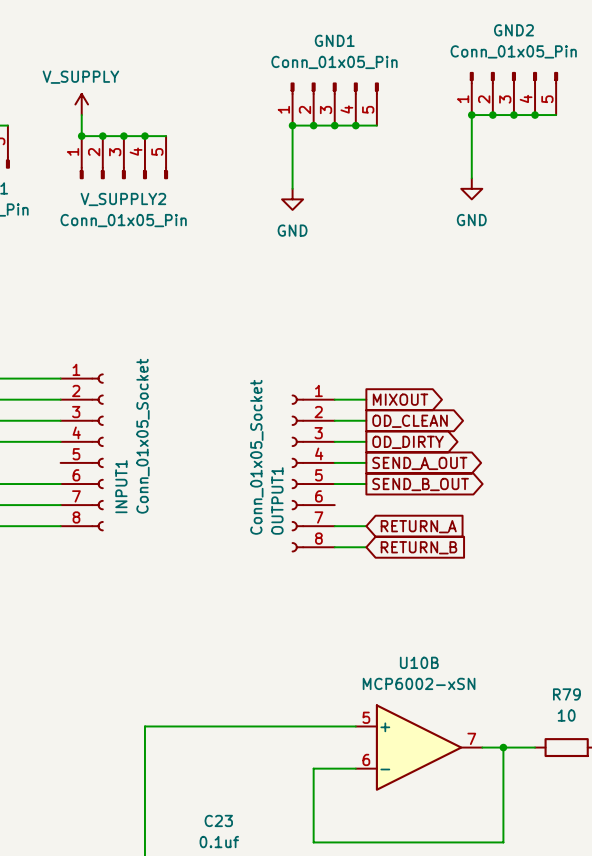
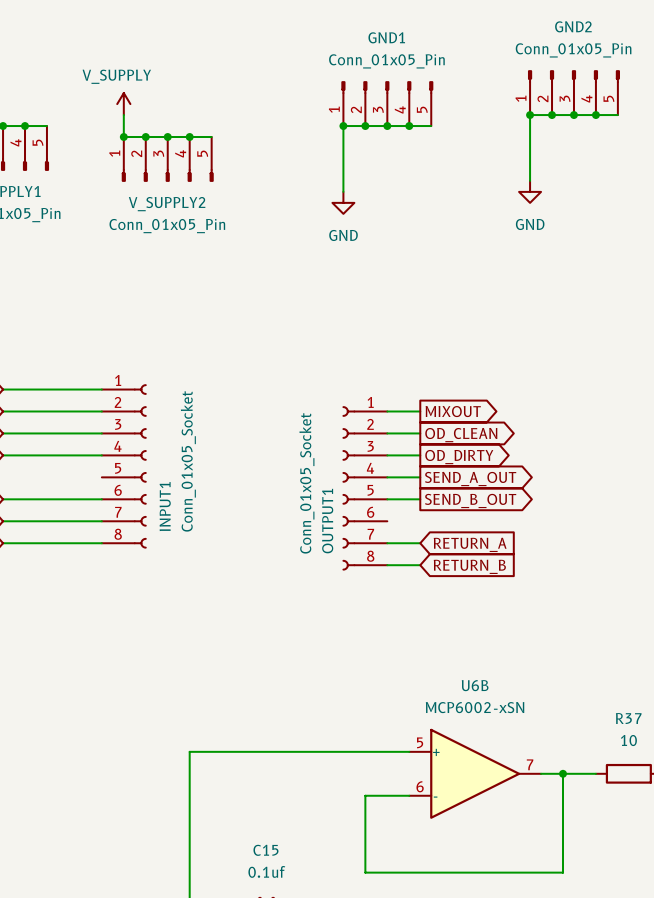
U10B name: U10B (419, 662) -> U6B (475, 685)
R79 name: R79 (566, 694) -> R37 (628, 718)
C23 name: C23 (218, 820) -> C15 (265, 850)

